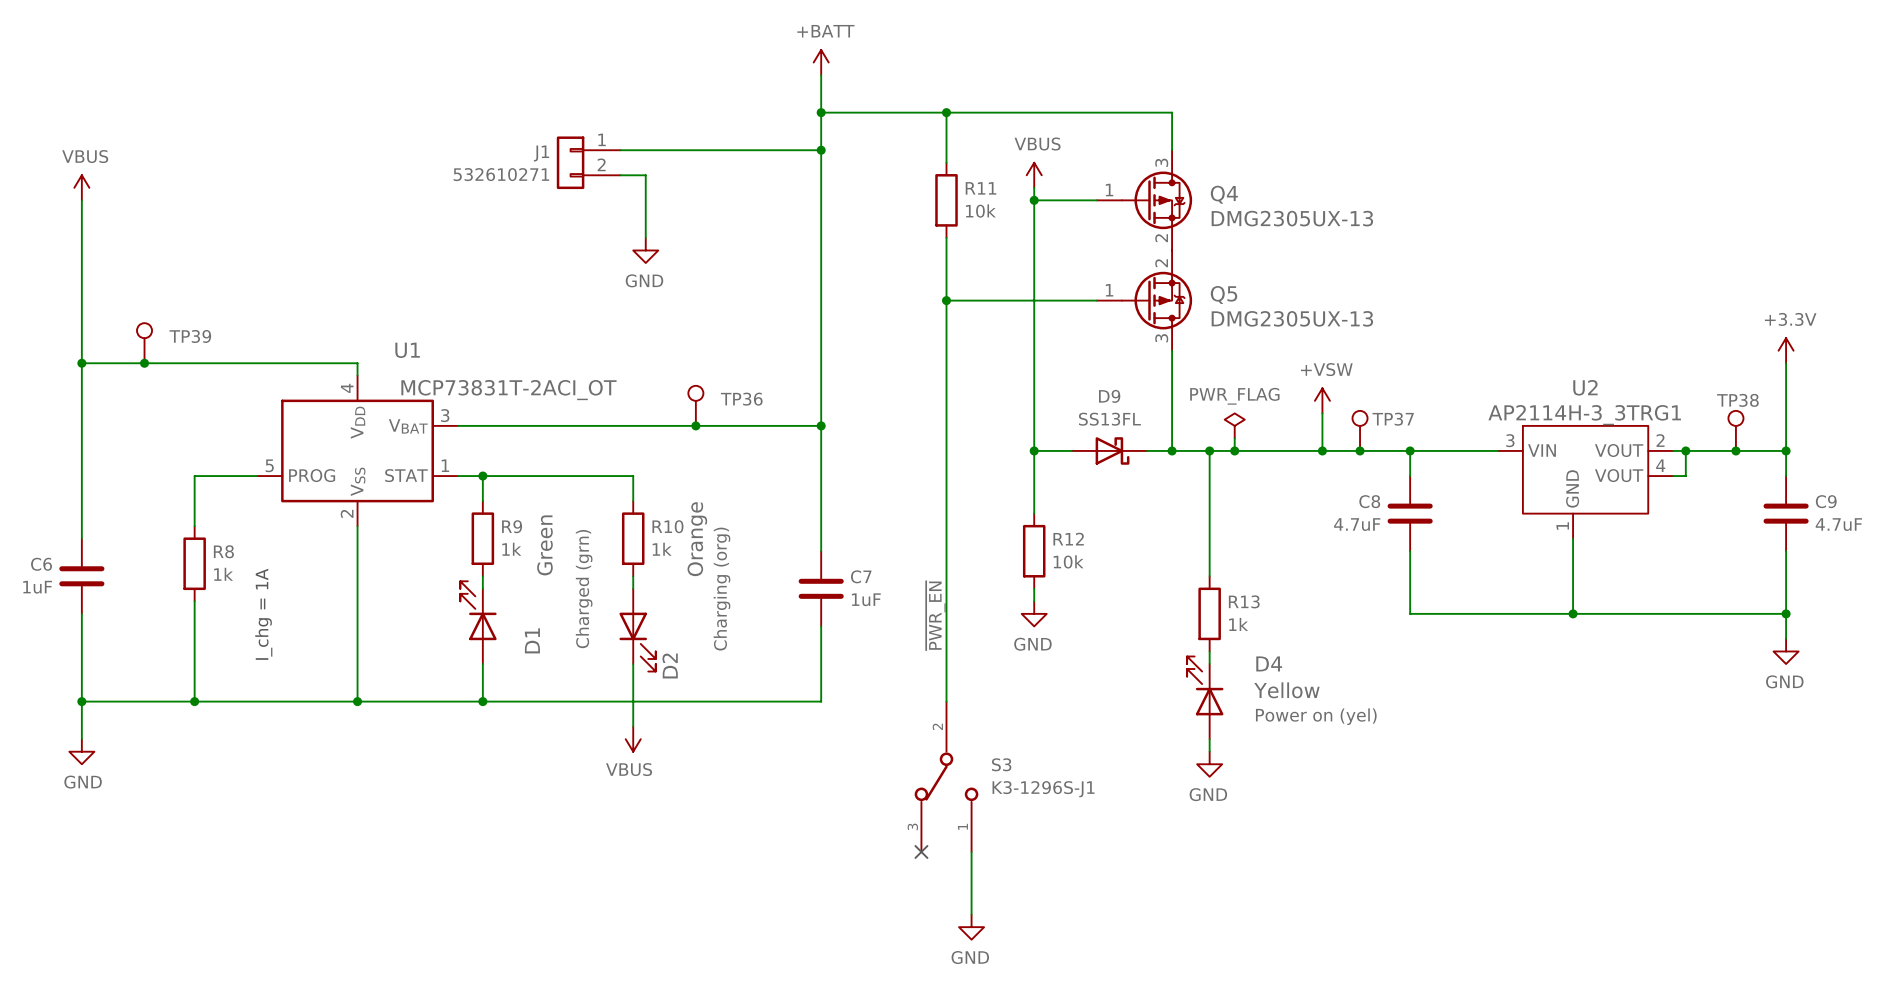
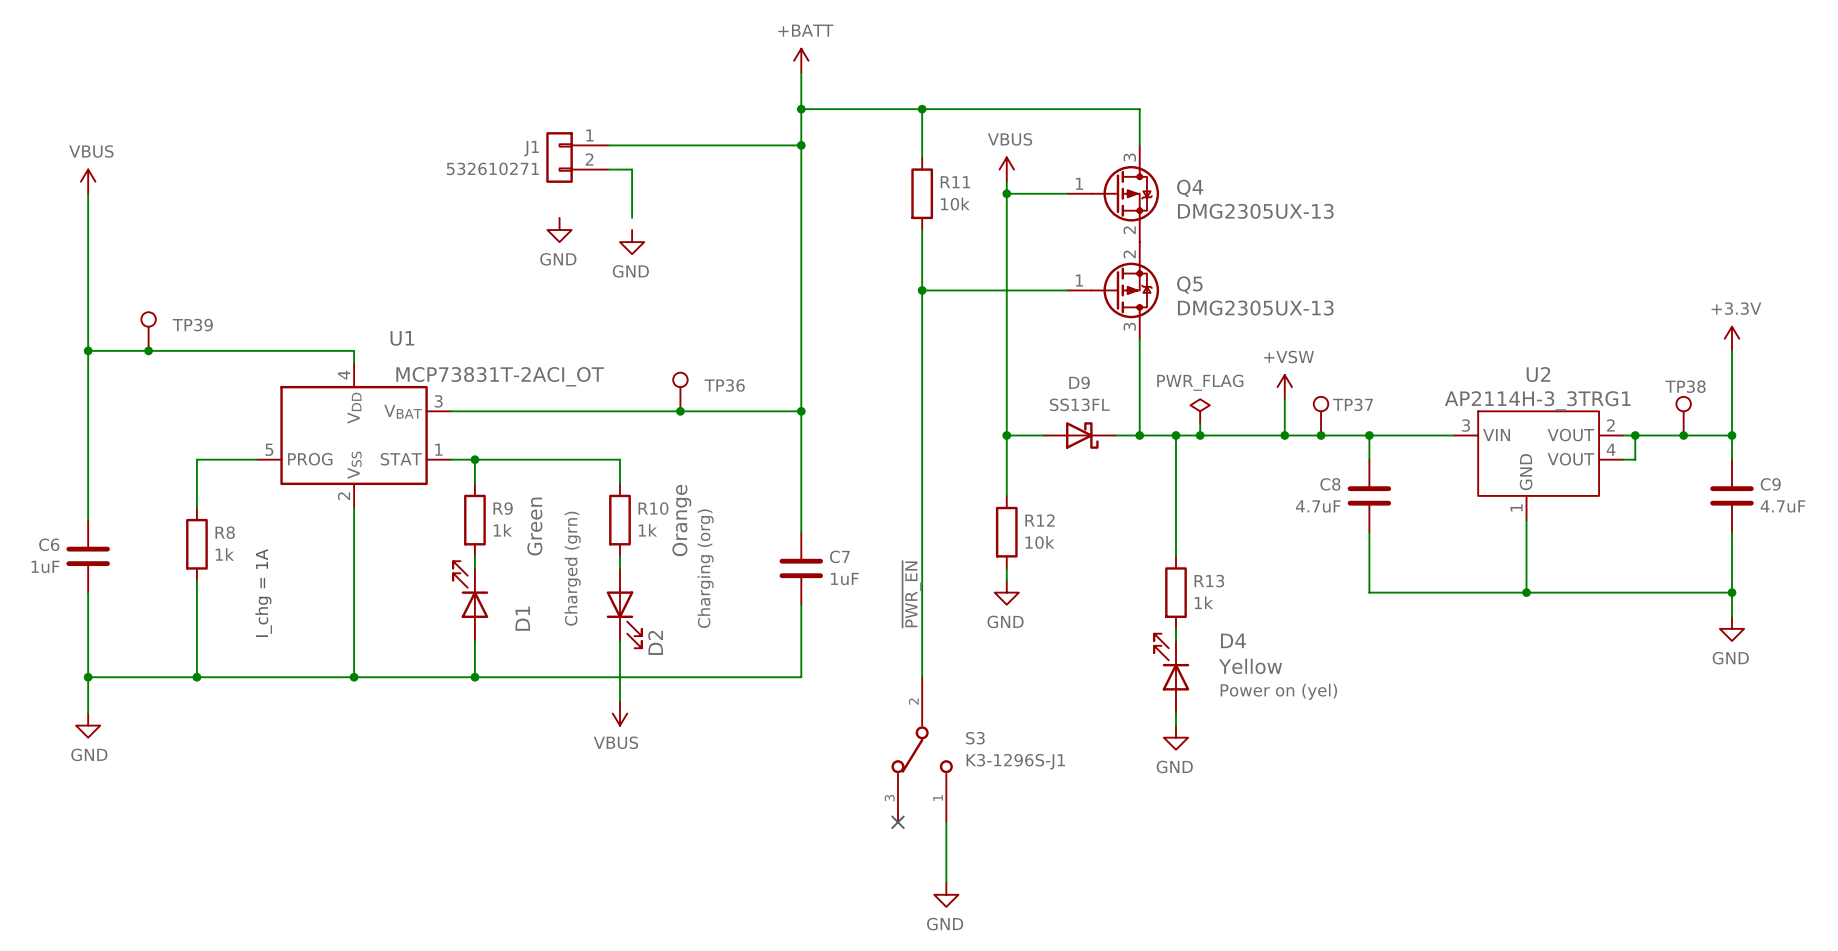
wire: (645, 225) (645, 237) -> none
power symbol: none -> GND (559, 230)

